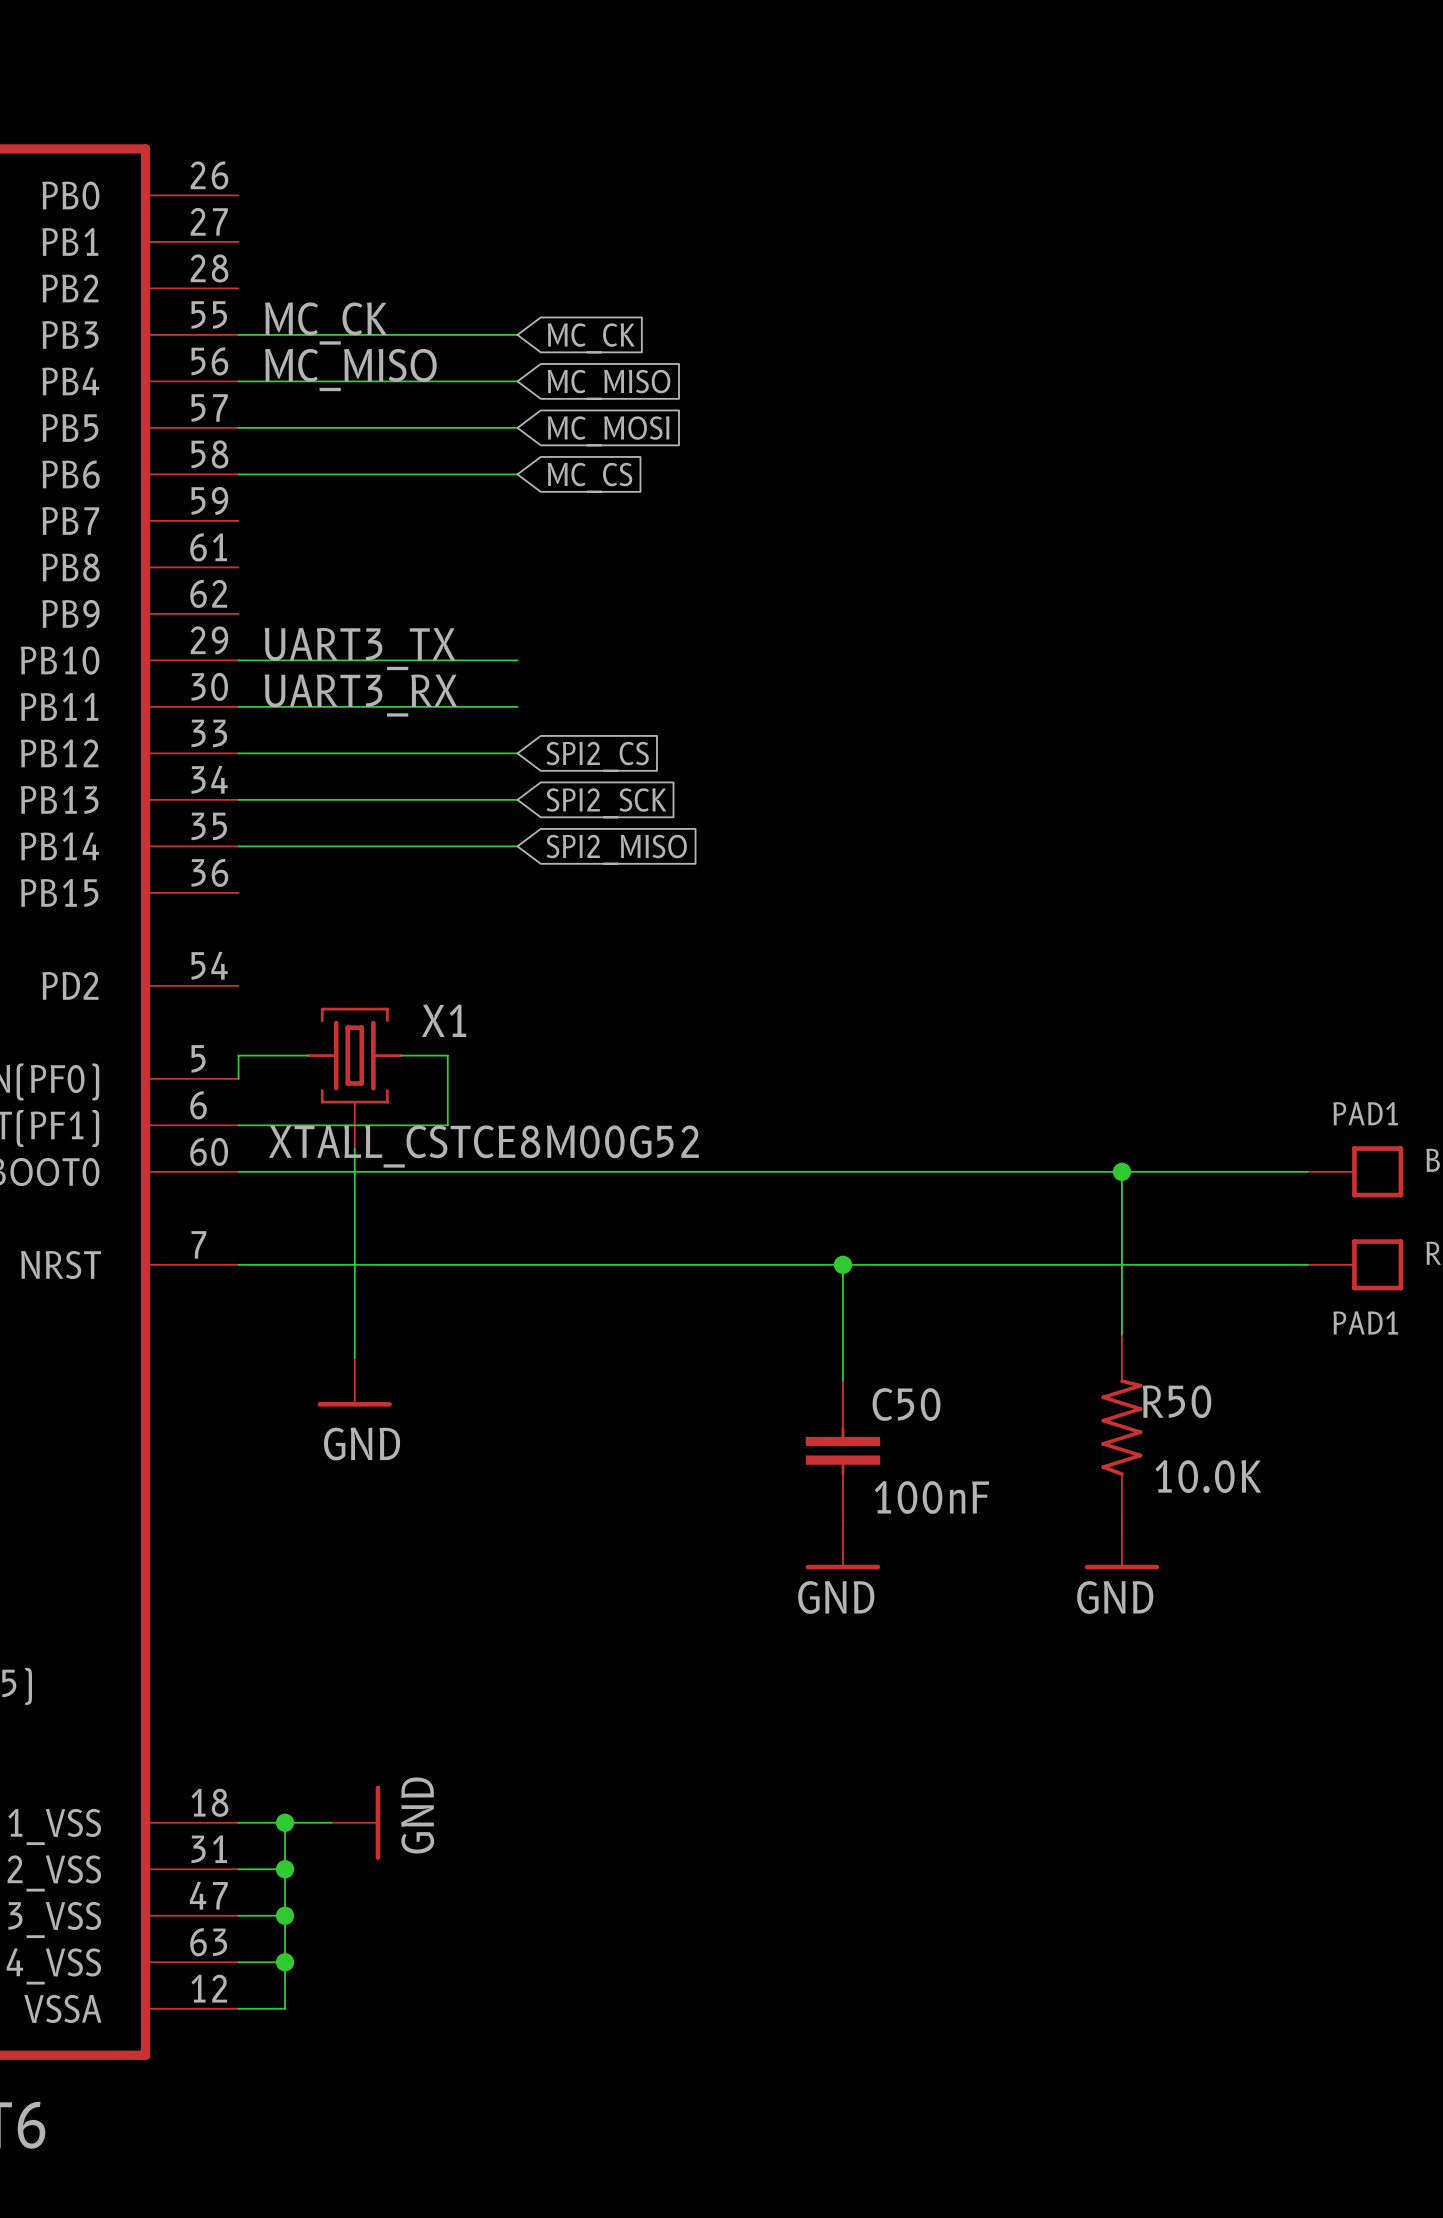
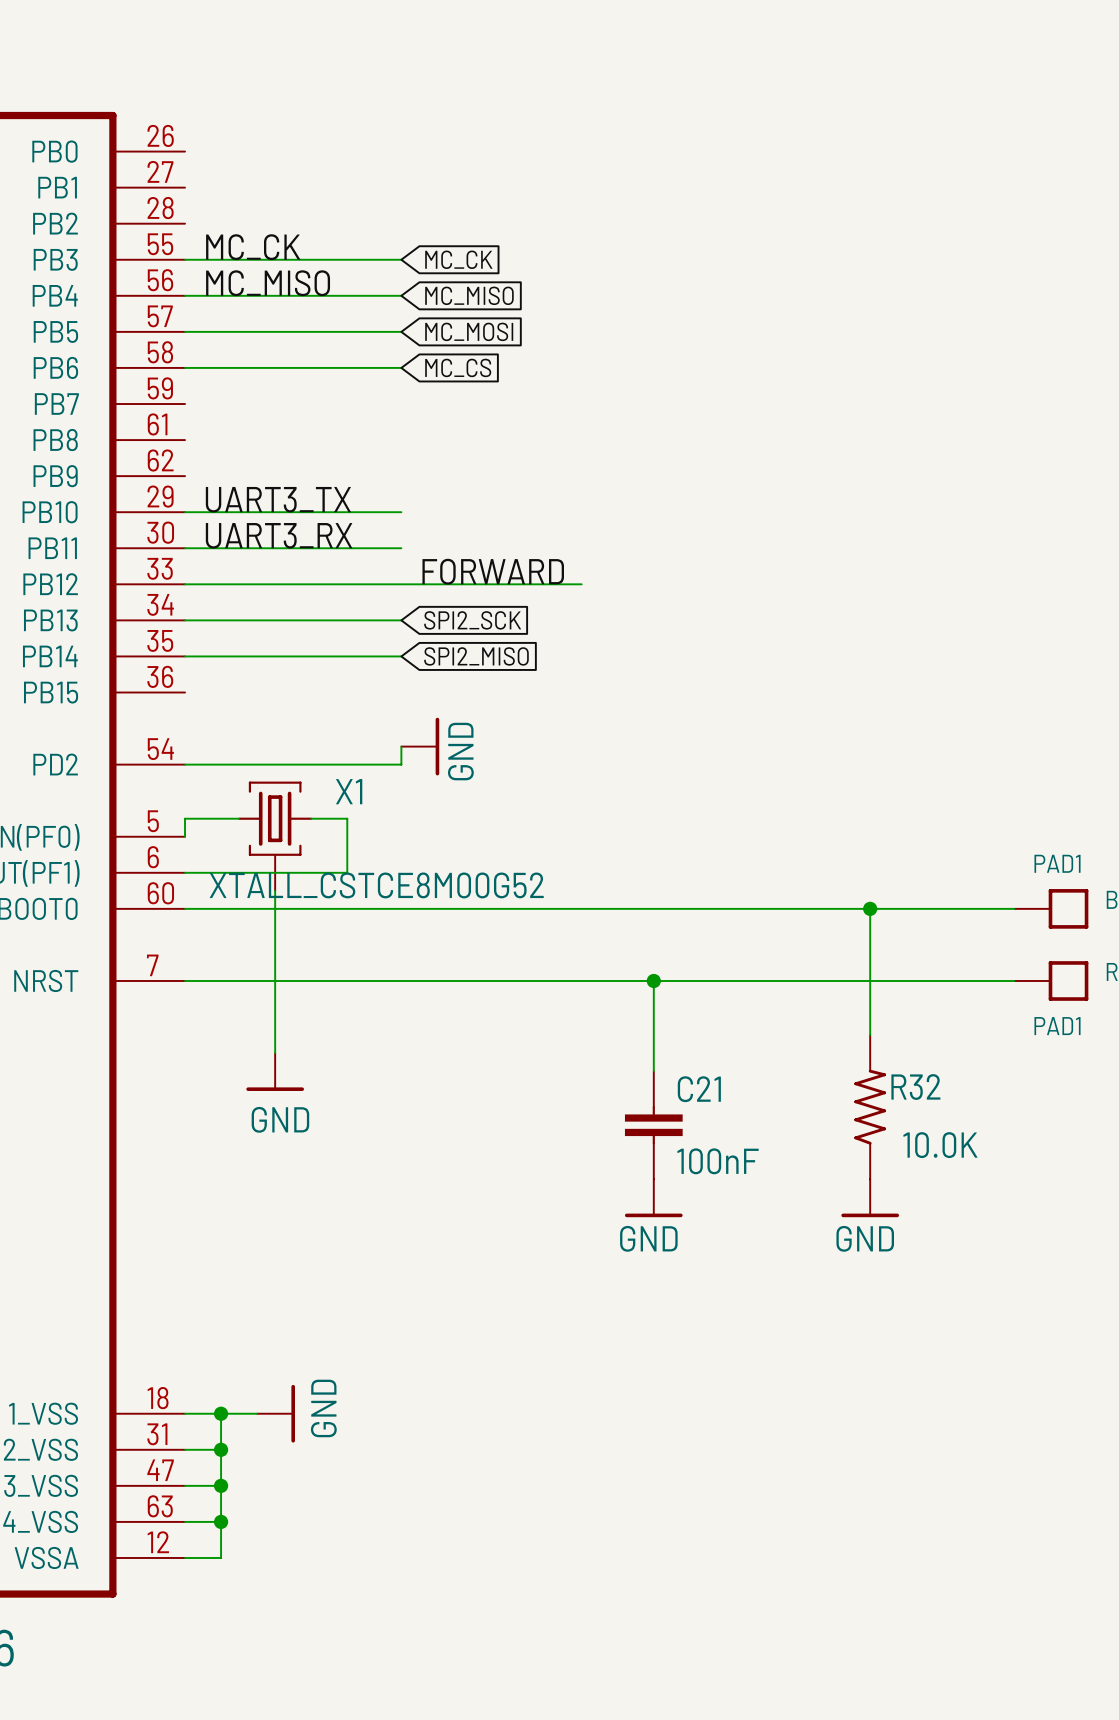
label: none -> FORWARD (493, 571)
wire: none -> (401, 584) (581, 584)
global label: SPI2_CS (597, 756) -> none
wire: none -> (401, 746) (401, 764) (185, 764)
power symbol: none -> GND (420, 746)
R50 name: R50 (1177, 1401) -> R32 (915, 1087)
C50 name: C50 (906, 1404) -> C21 (699, 1089)

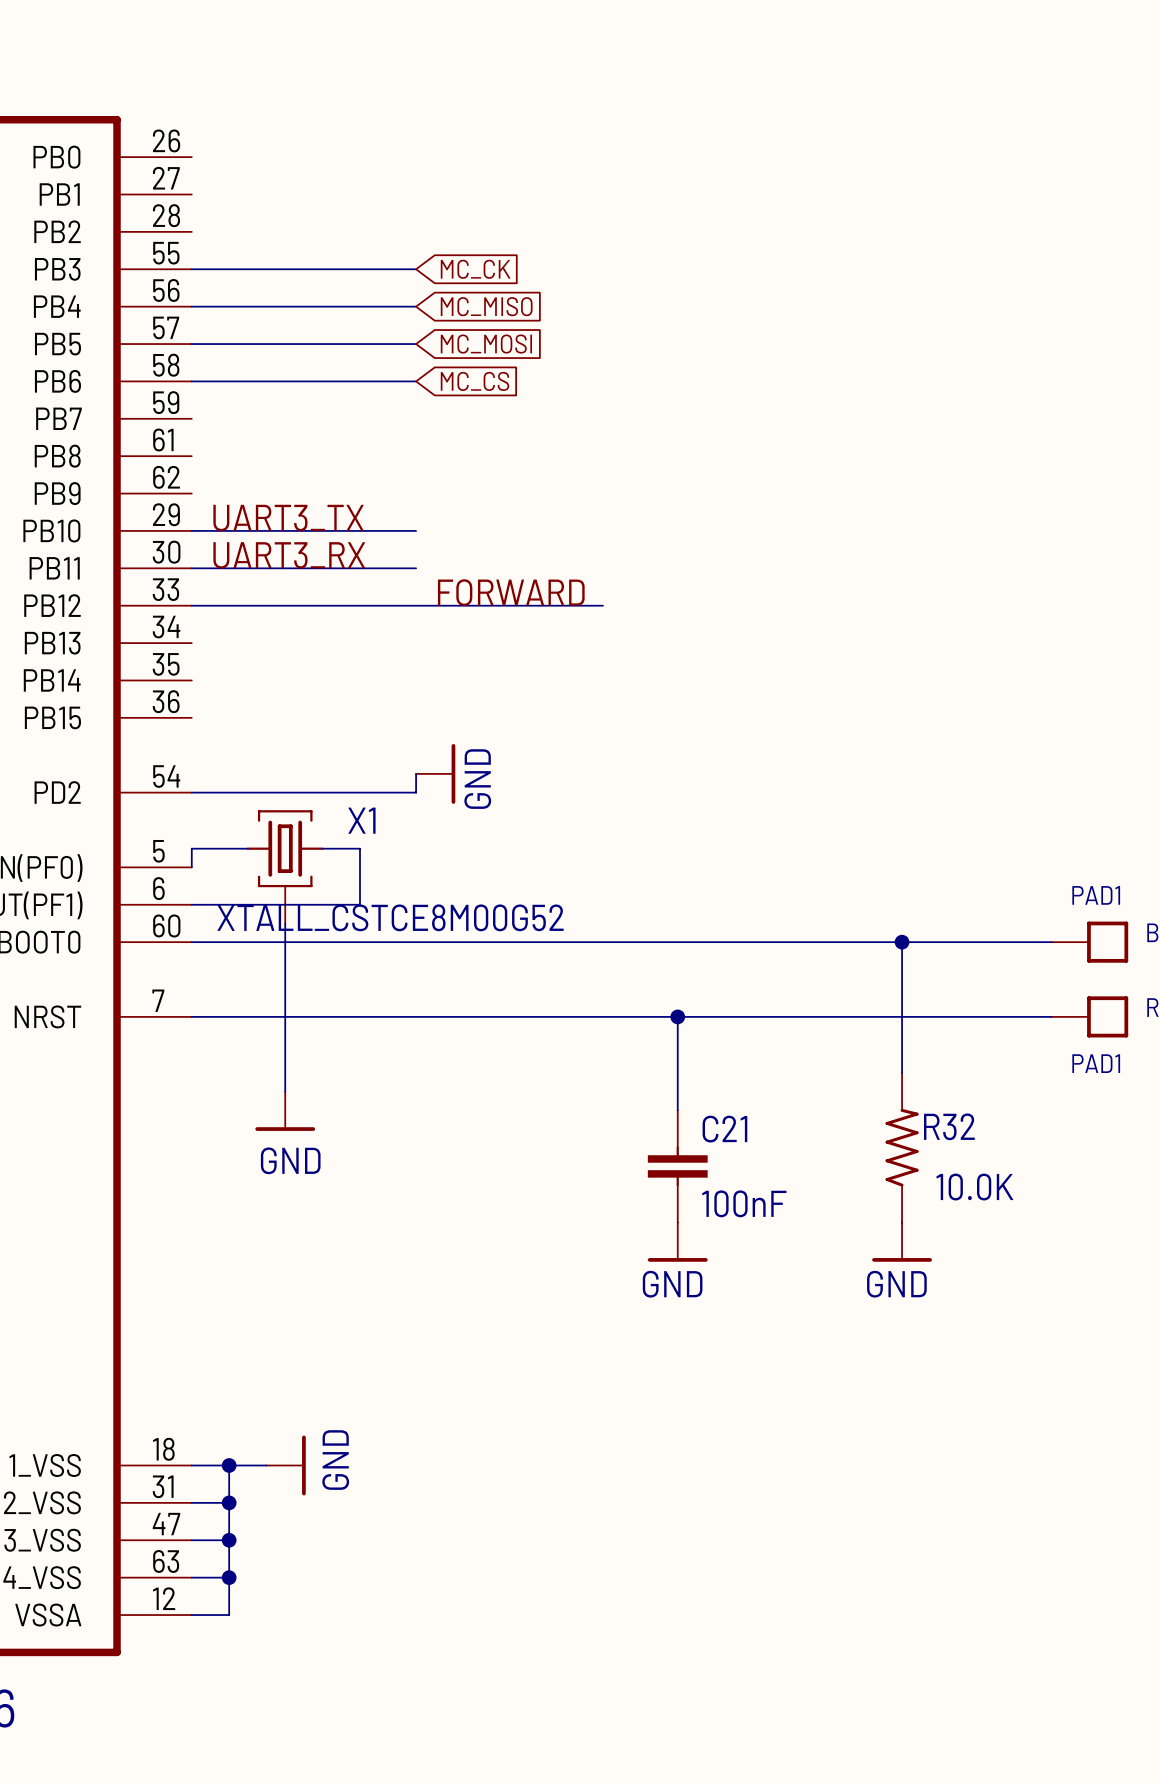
label: MC_CK (253, 247) -> none
label: MC_MISO (268, 283) -> none
wire: (185, 620) (401, 620) -> none
global label: SPI2_SCK (472, 620) -> none
wire: (185, 656) (401, 656) -> none
global label: SPI2_MISO (476, 656) -> none

